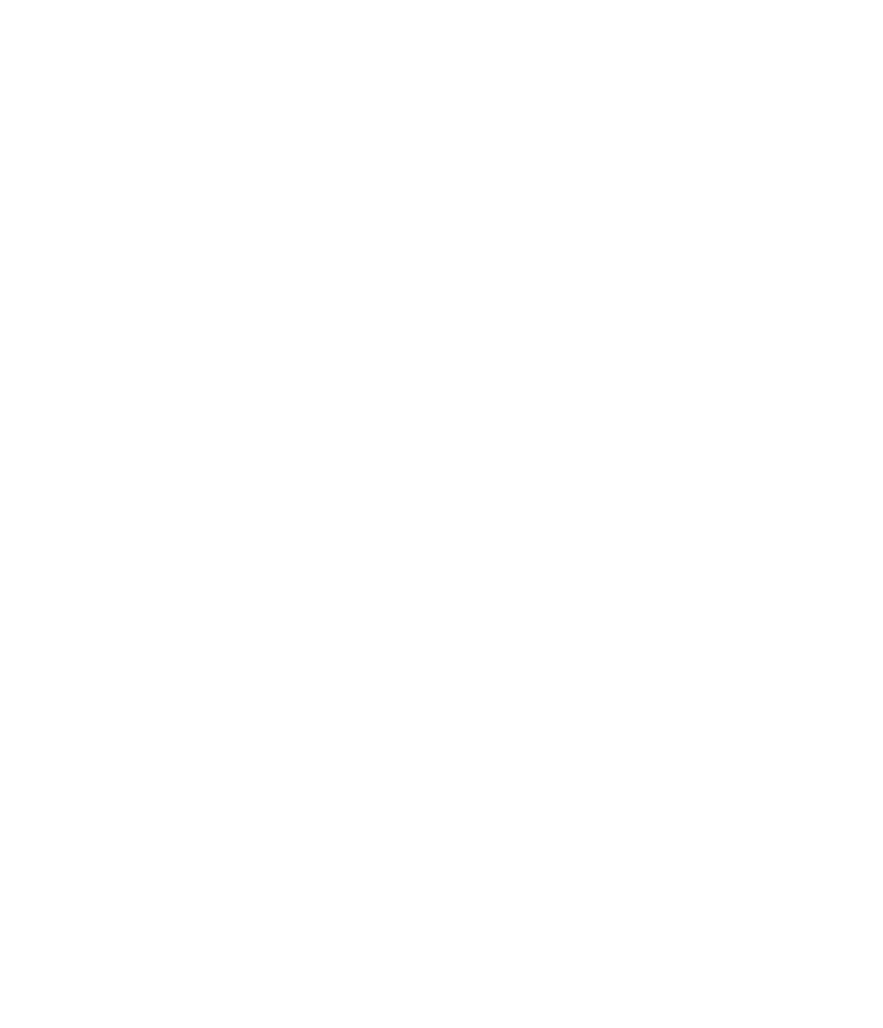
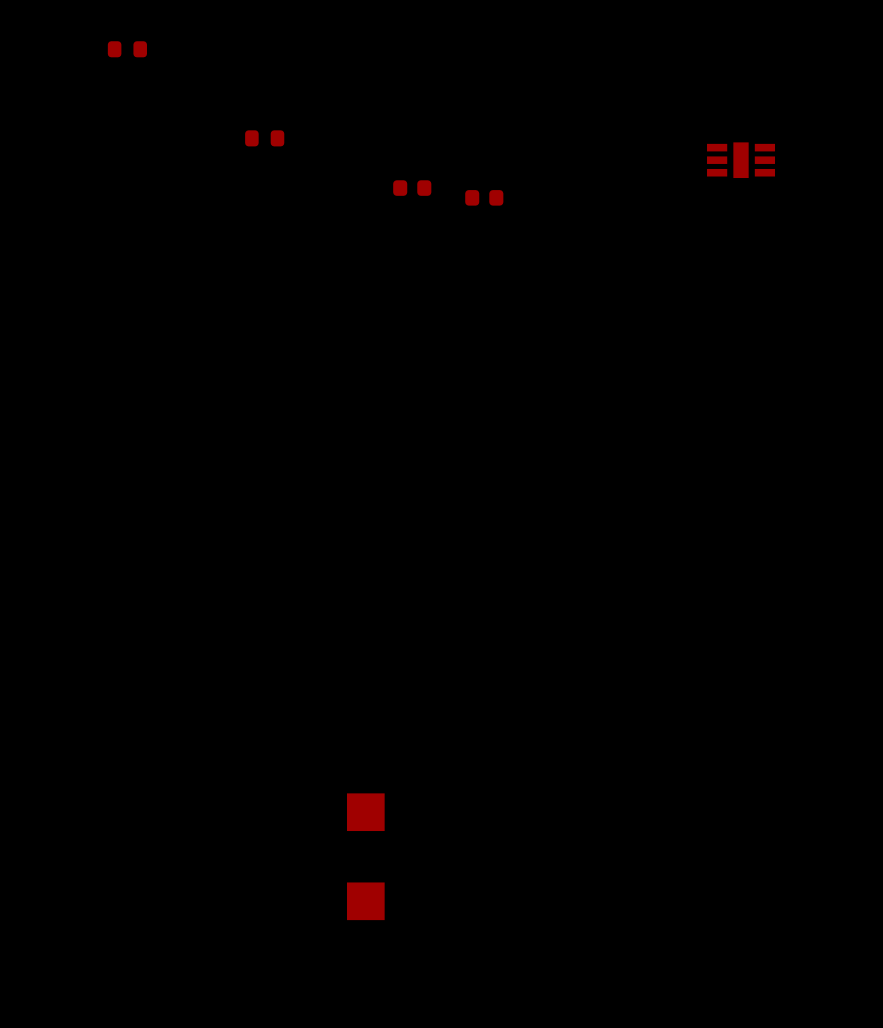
part: none -> (127, 49)
part: none -> (264, 138)
part: none -> (741, 160)
part: none -> (412, 188)
part: none -> (484, 197)
part: none -> (365, 812)
part: none -> (365, 901)

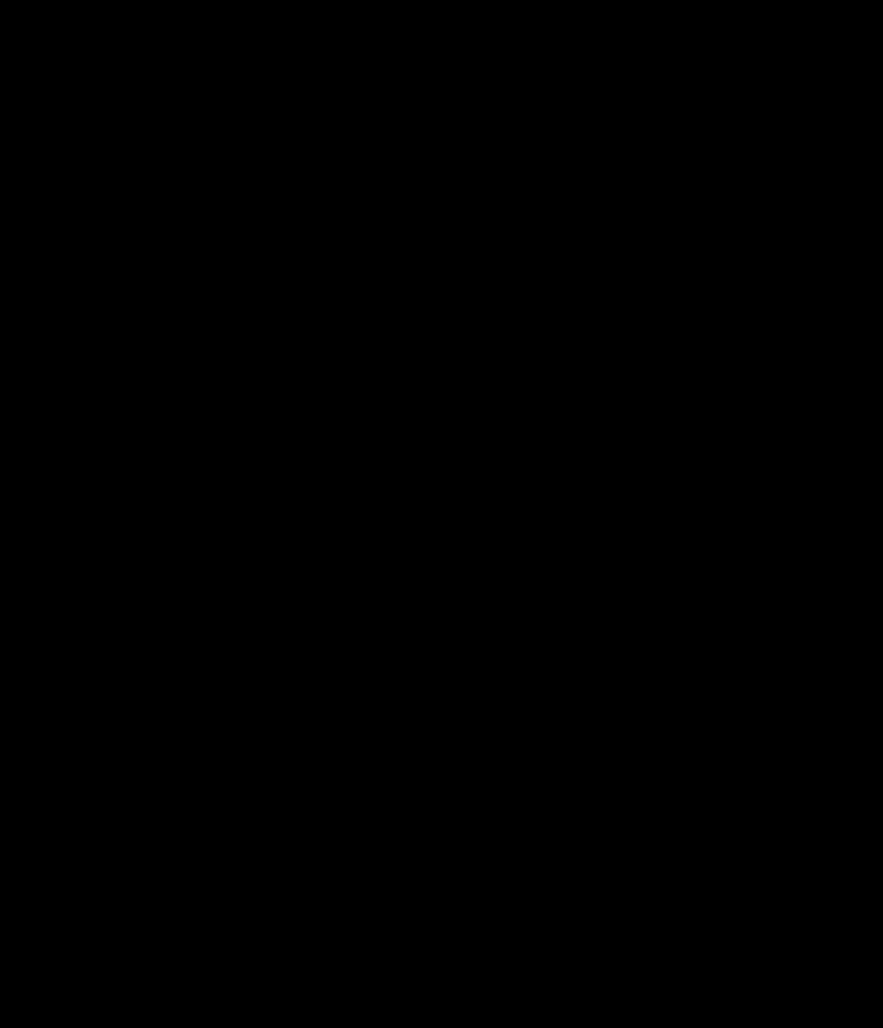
part: (127, 49) -> none
part: (264, 138) -> none
part: (741, 160) -> none
part: (412, 188) -> none
part: (484, 197) -> none
part: (365, 812) -> none
part: (365, 901) -> none

